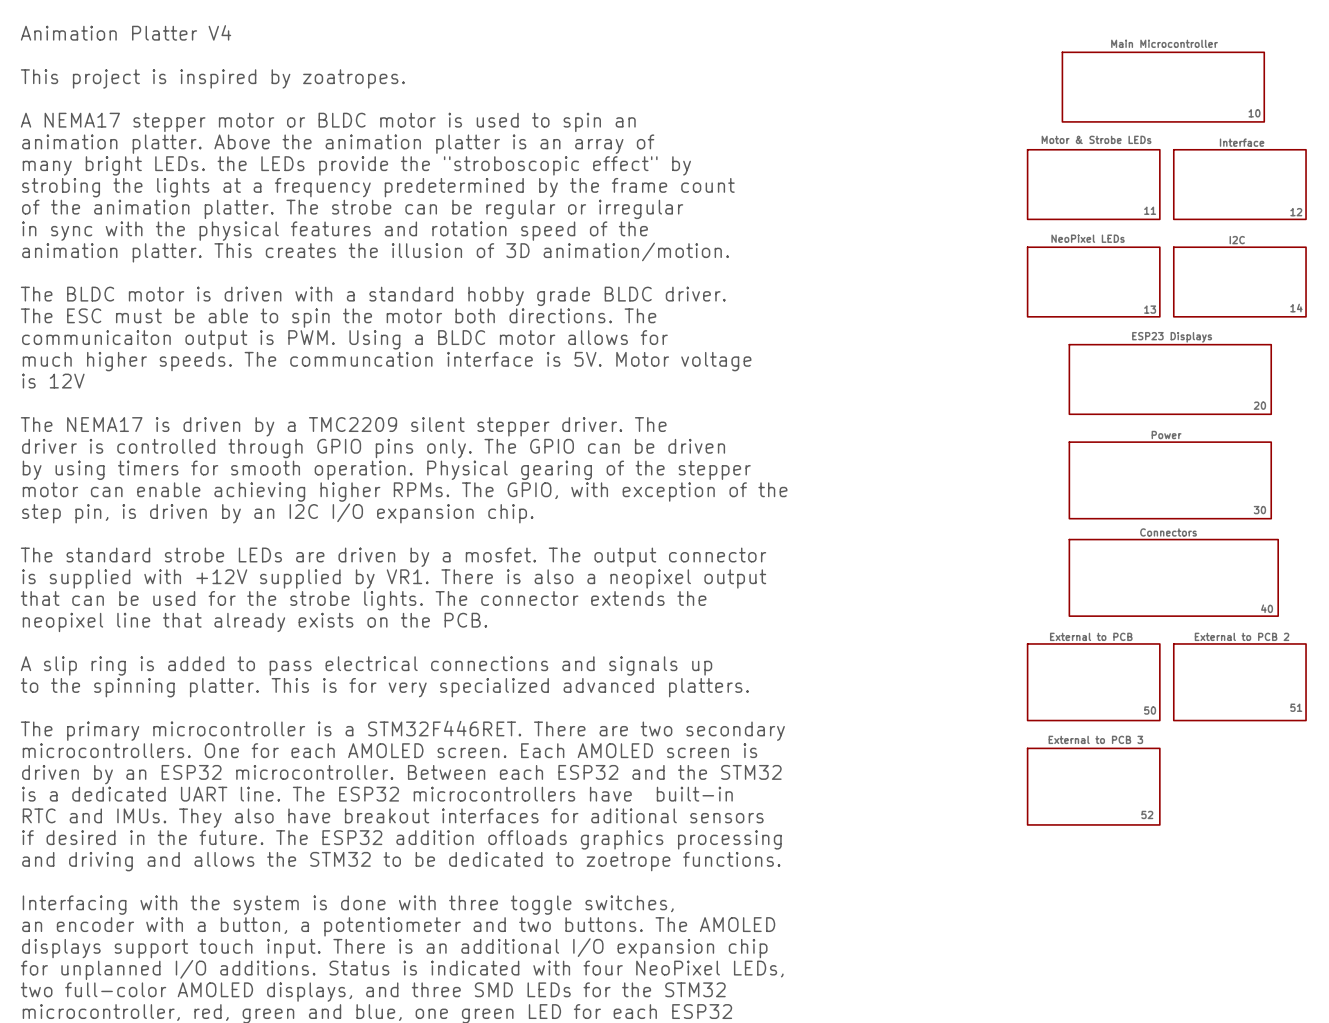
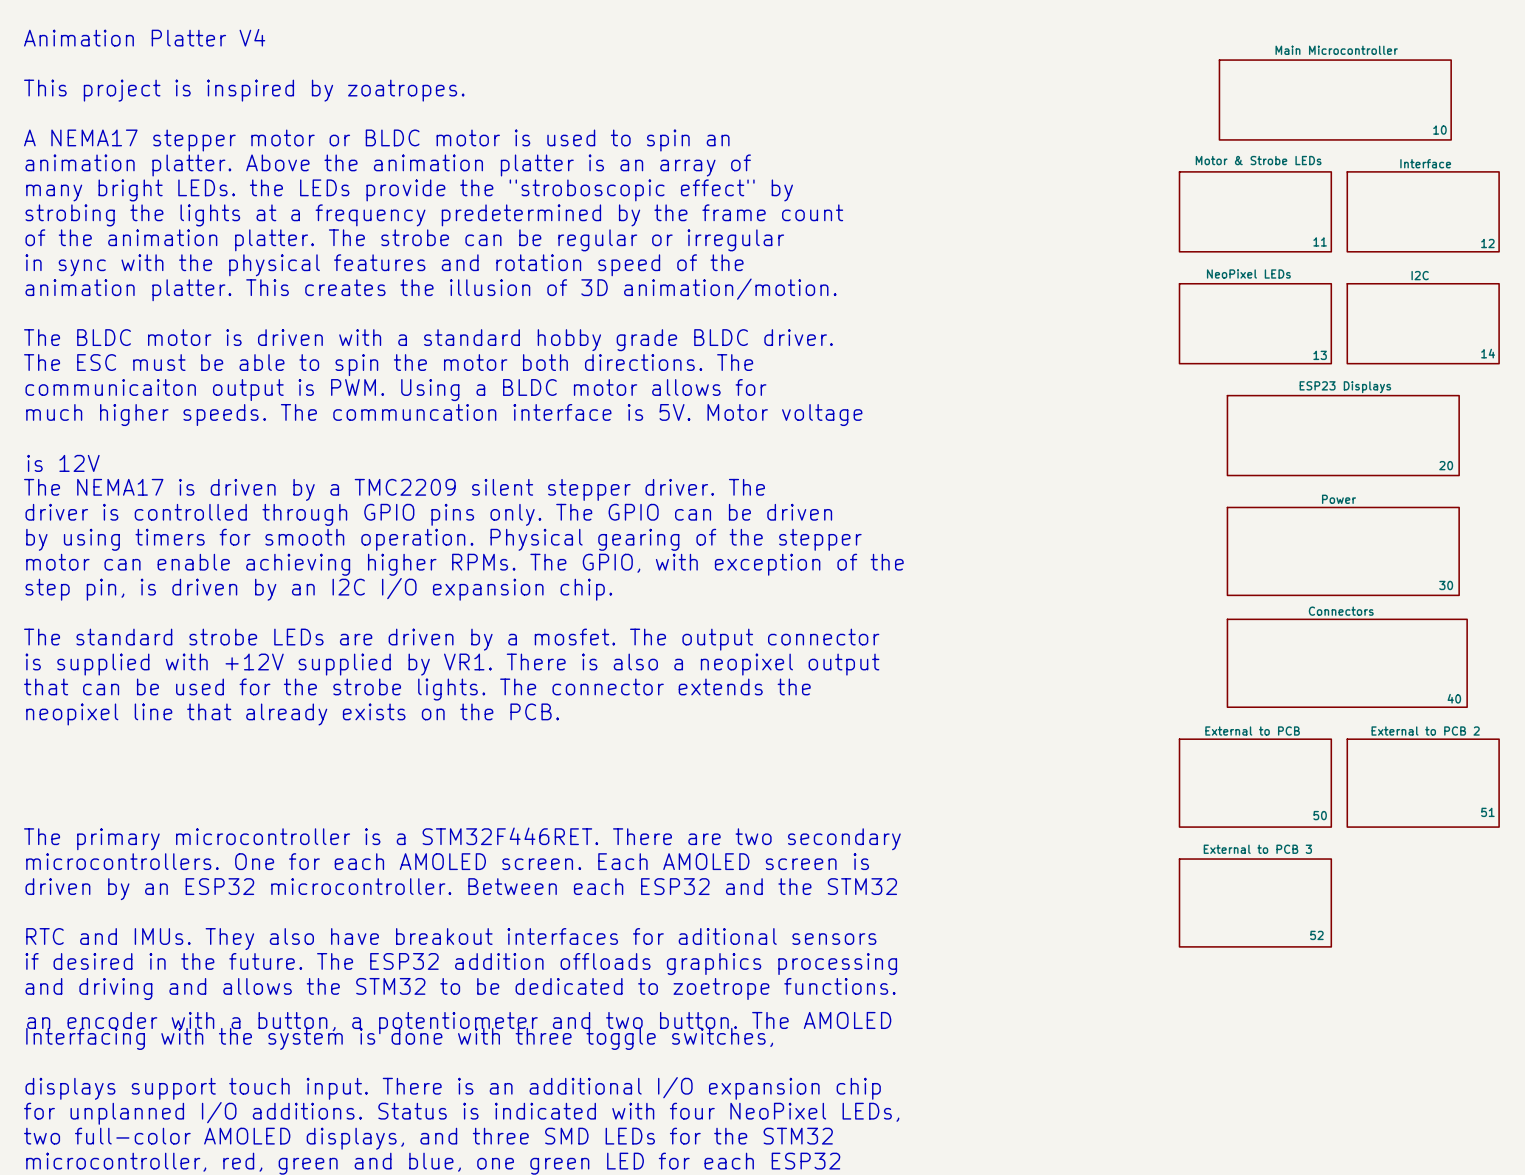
text position: is 12V (53, 381) -> is 12V (63, 463)
text: A slip ring is added to pass electrical connections and signals up (366, 665) -> none
text: to the spinning platter. This is for very specialized advanced platters. (384, 687) -> none
text: is a dedicated UART line. The ESP32 microcontrollers have built-in (377, 794) -> none
text: none -> an encoder with a button, a potentiometer and two button. The AMOLED (459, 1023)
text: an encoder with a button, a potentiometer and two buttons. The AMOLED (398, 926) -> none

